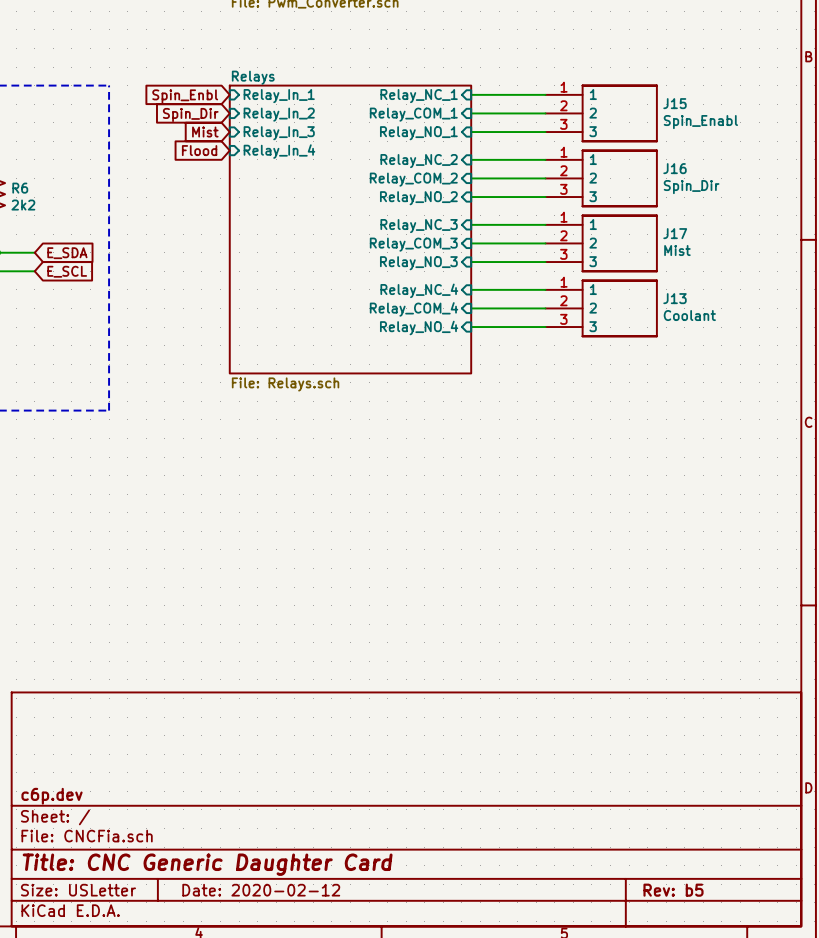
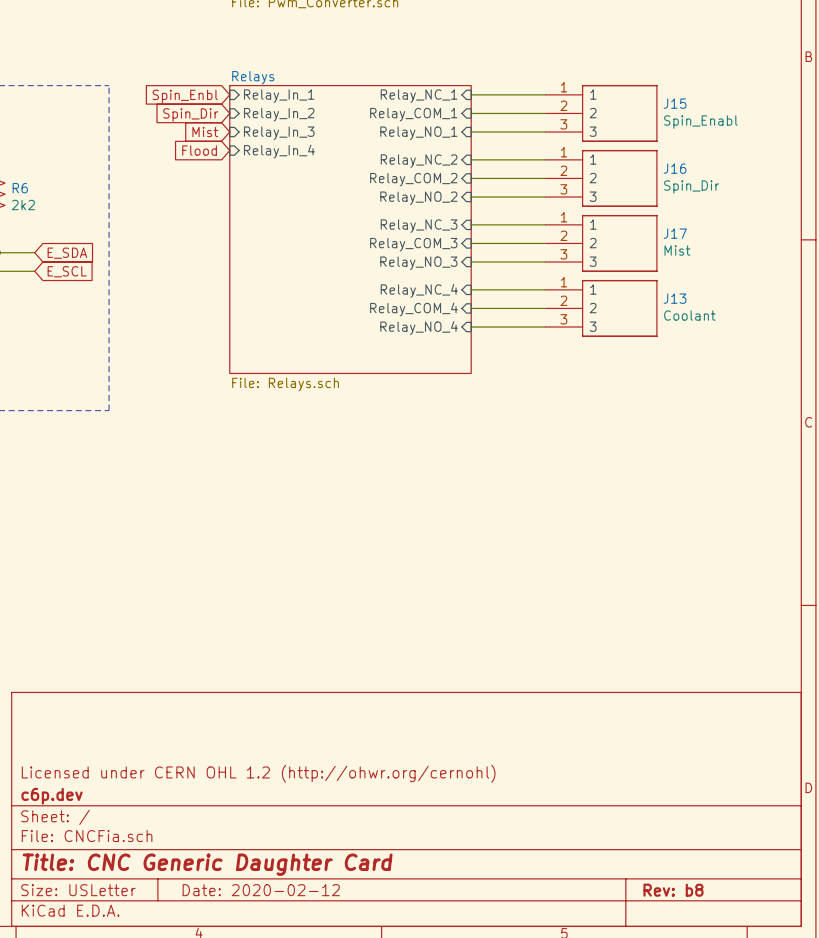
title block: none -> Licensed under CERN OHL 1.2 (http://ohwr.org/cernohl) (258, 773)
title block: Rev: b5 (673, 890) -> Rev: b8 (673, 890)

